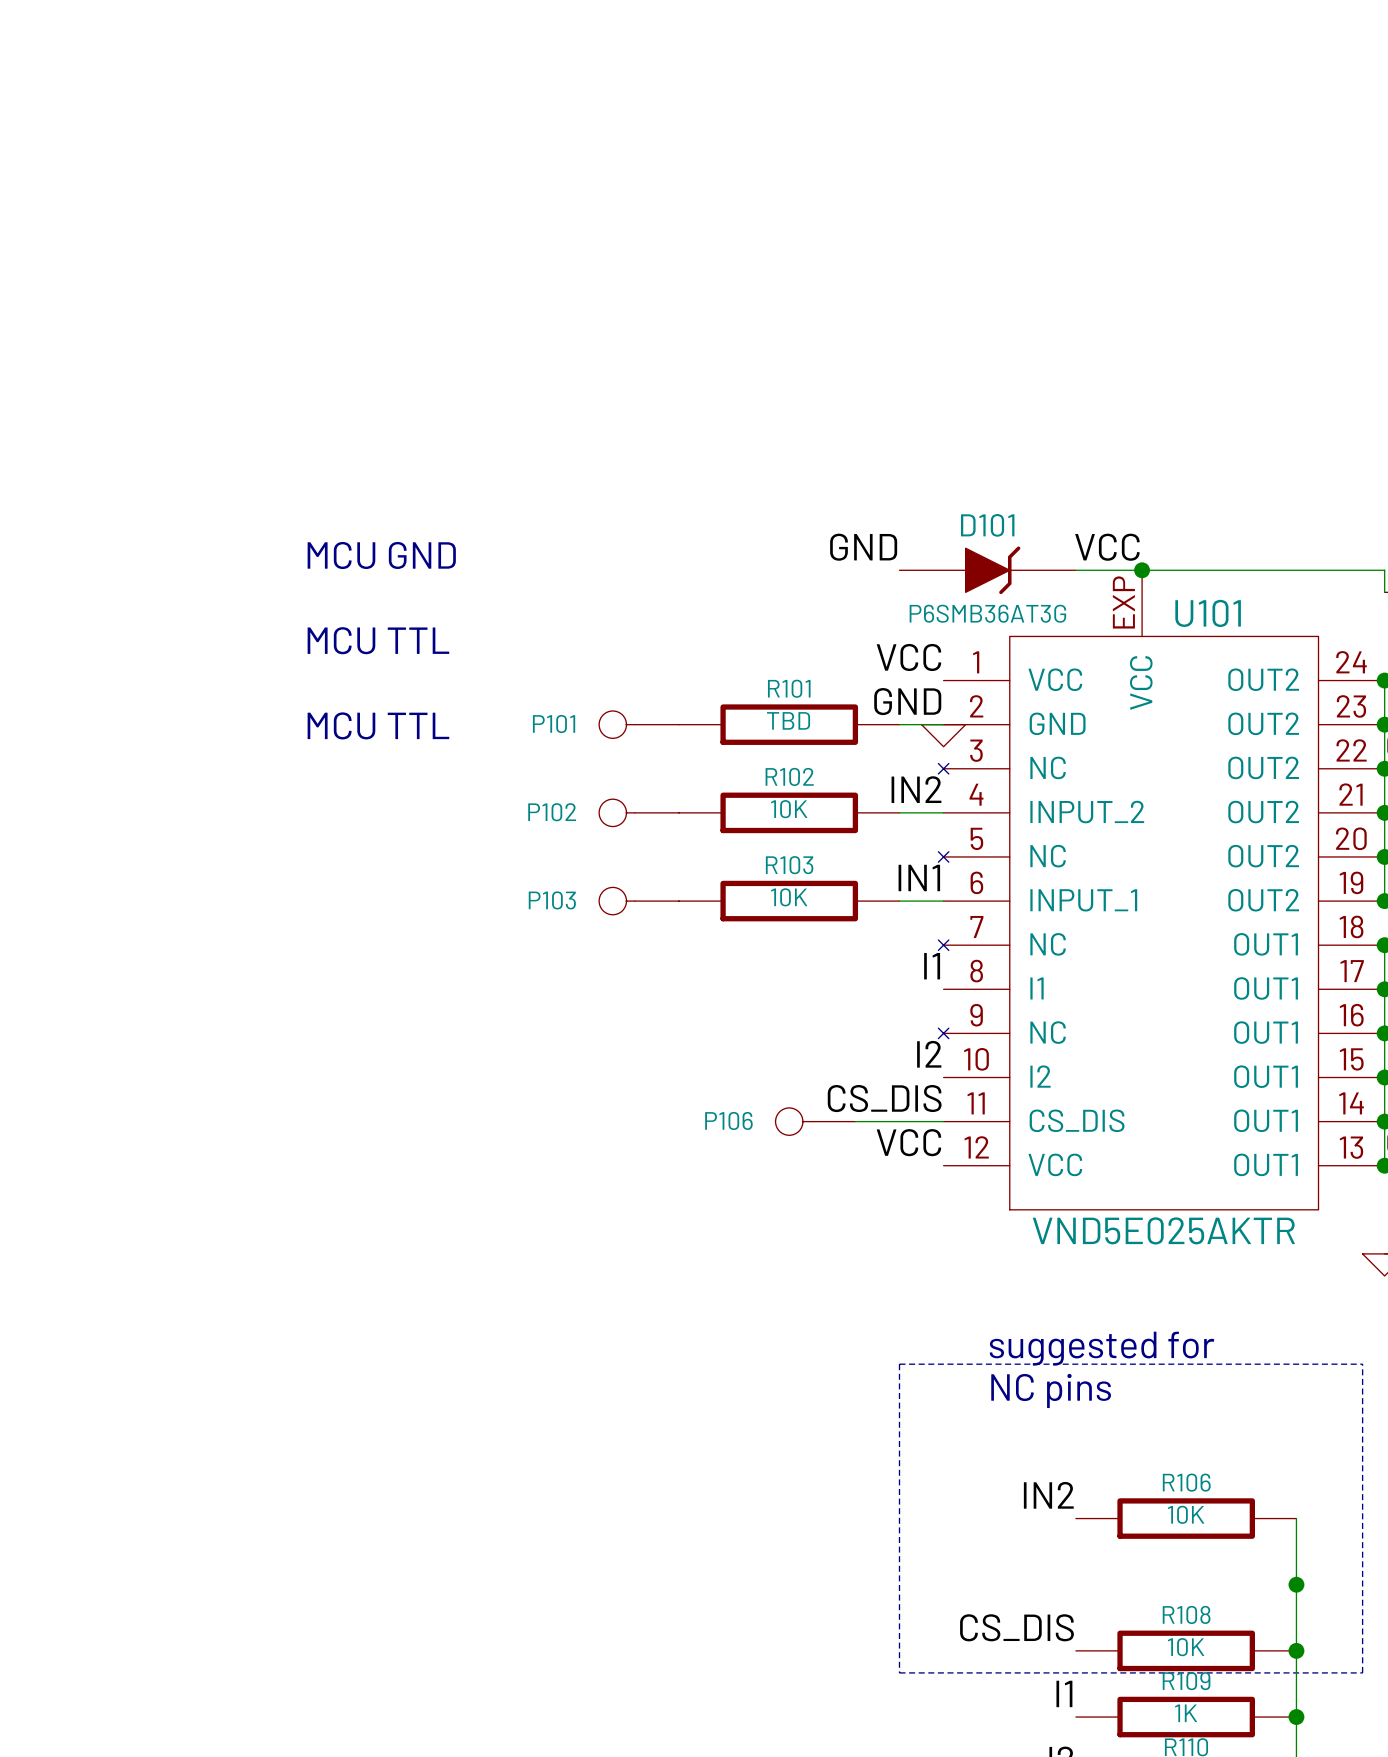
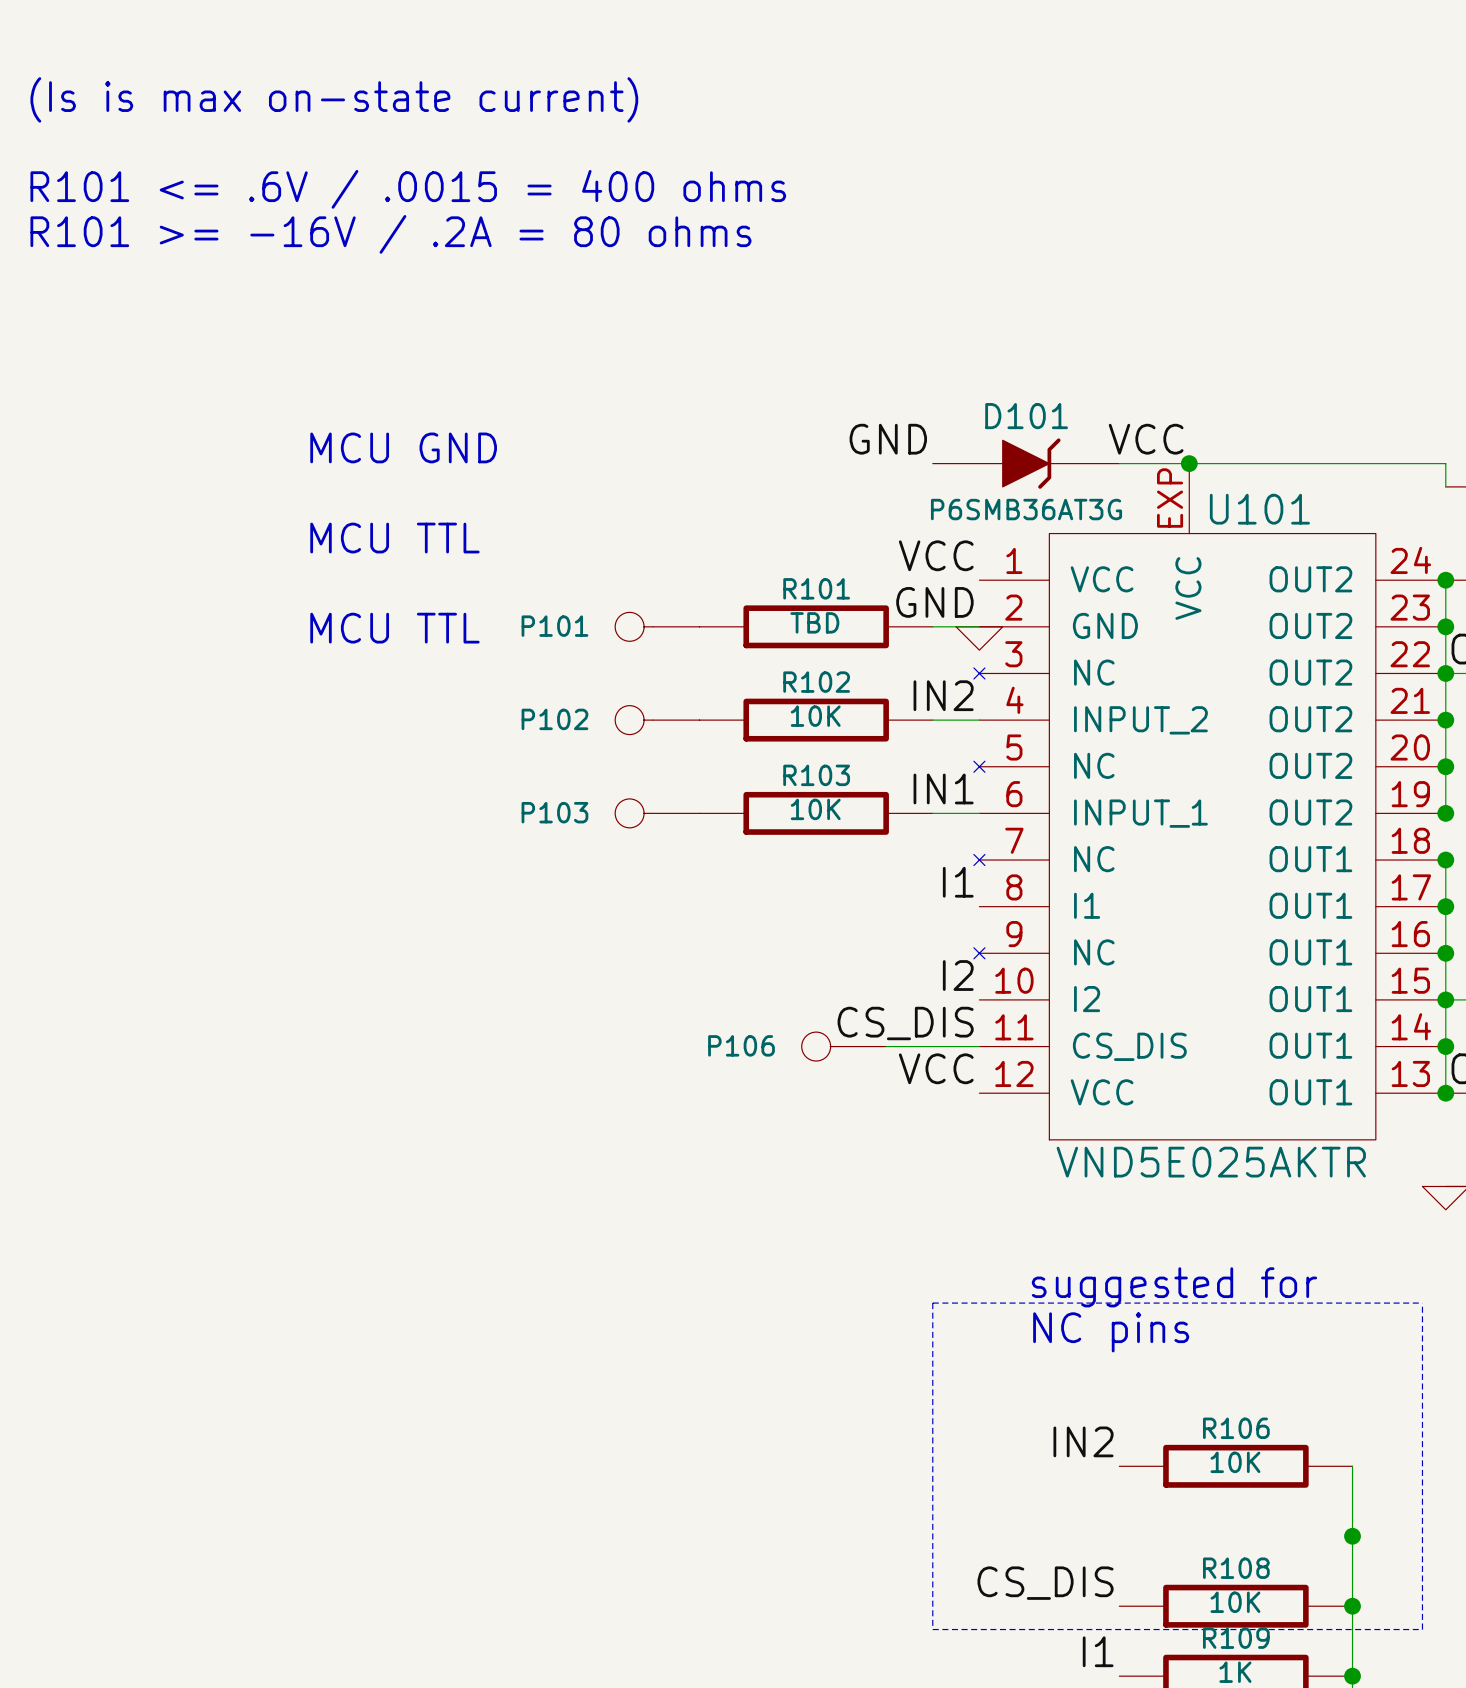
text: none -> (Is is max on-state current) (334, 99)
text: none -> R101 <= .6V / .0015 = 400 ohms (408, 189)
text: none -> R101 >= -16V / .2A = 80 ohms (390, 234)

